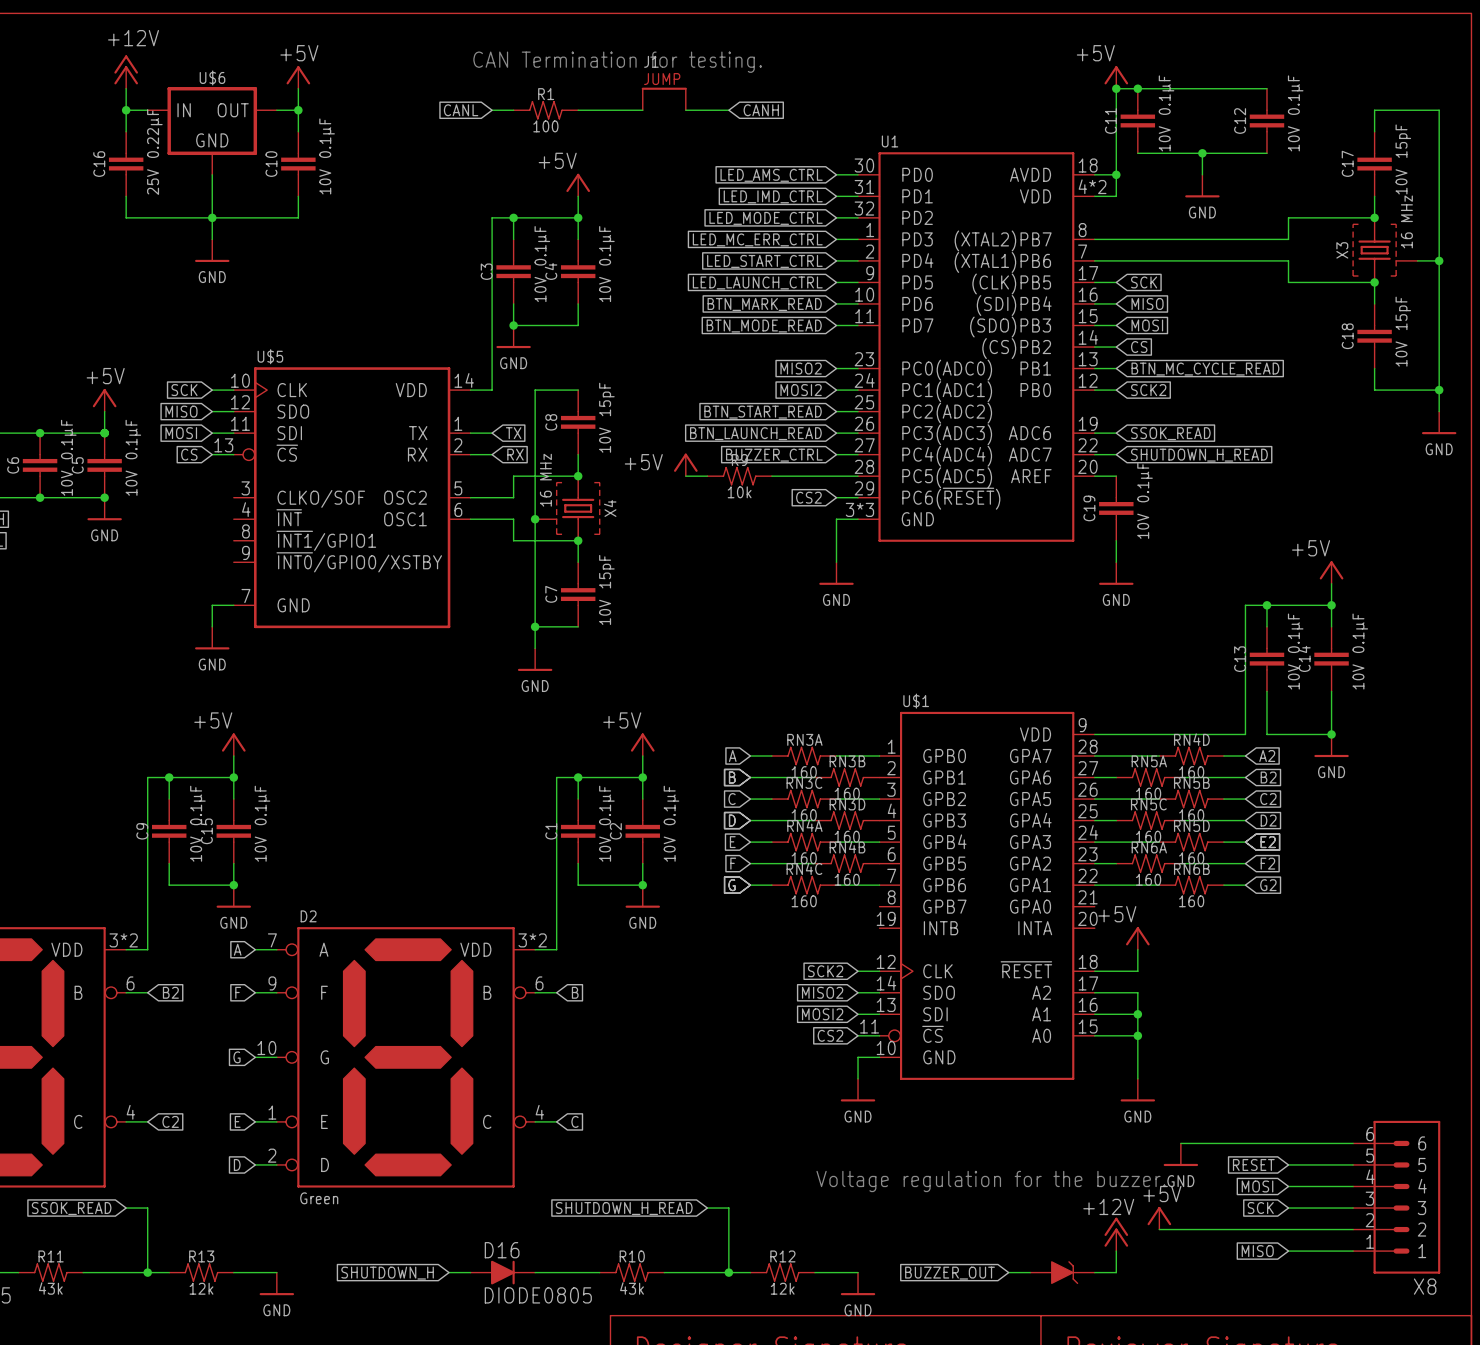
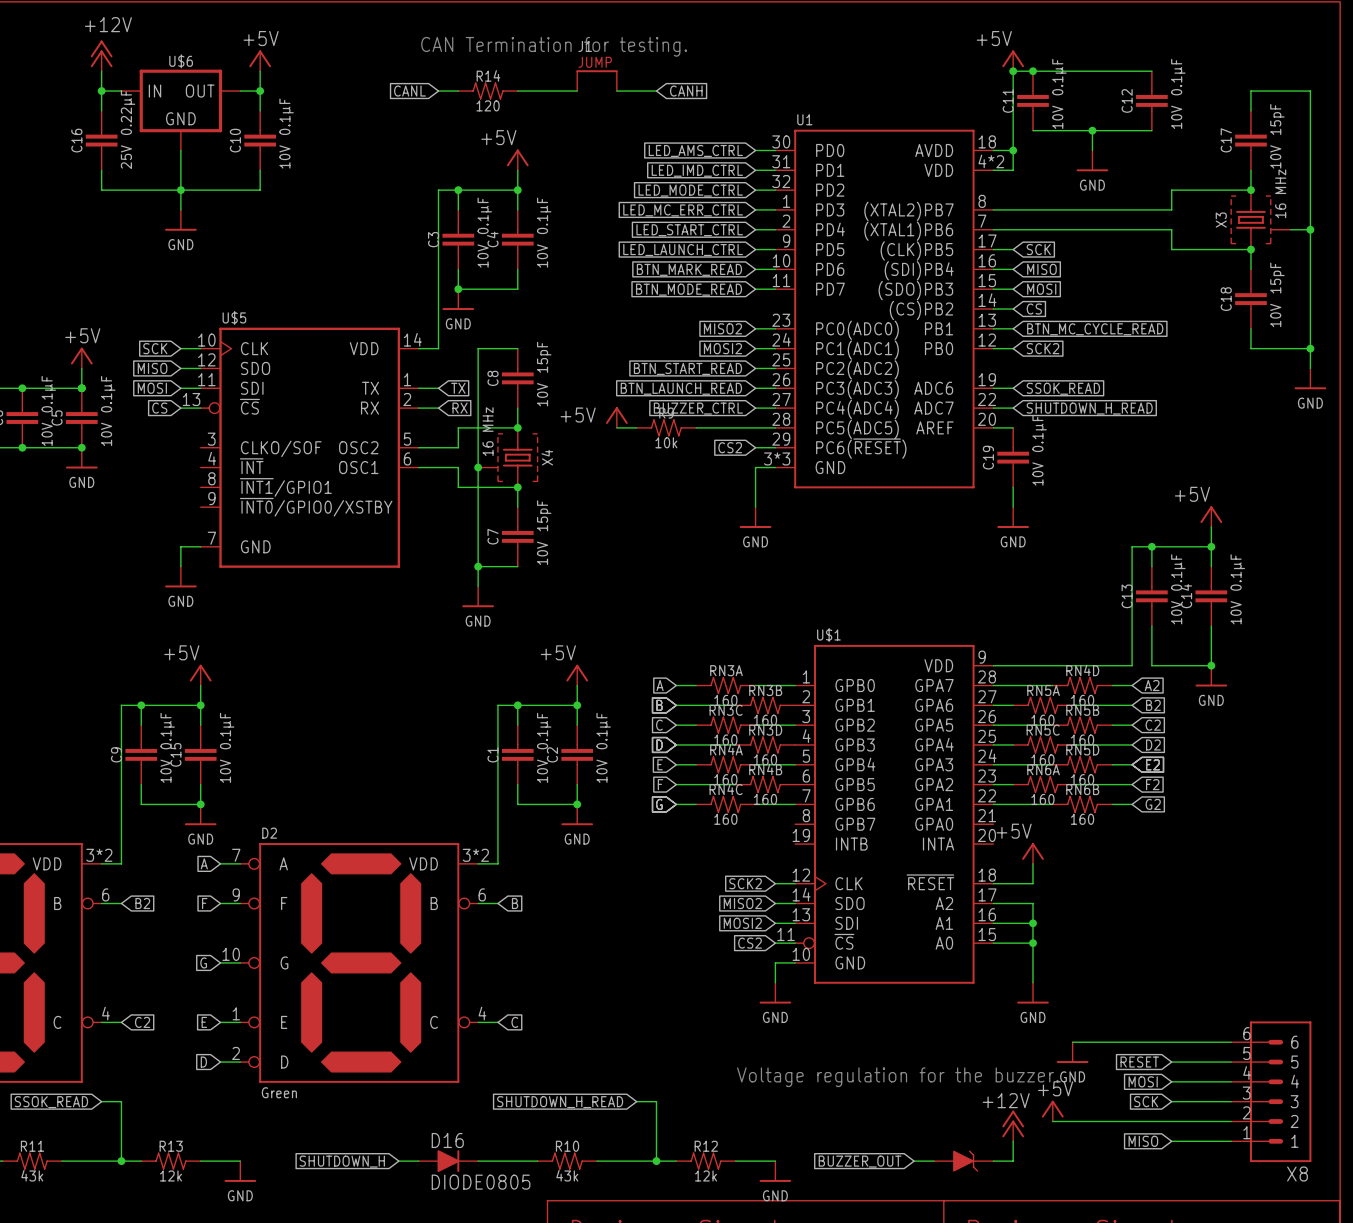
R1 name: R1 (546, 94) -> R14 (488, 75)
R1 text: 100 (545, 126) -> 120 (488, 105)

